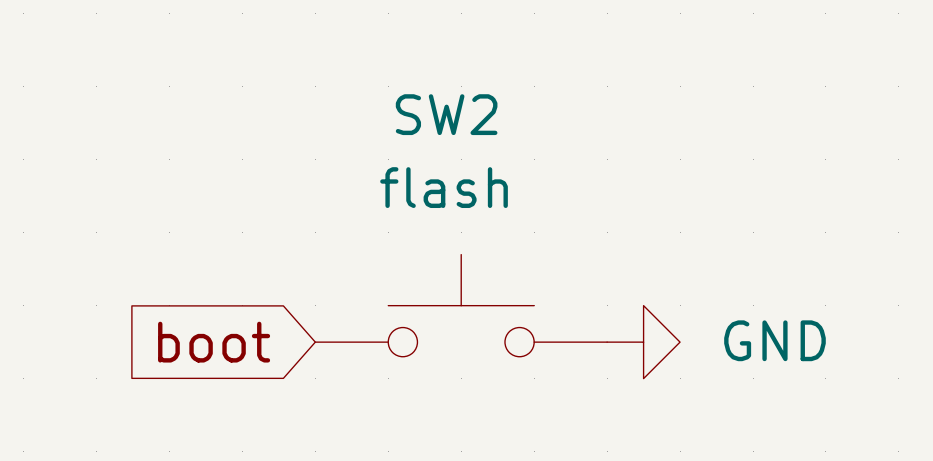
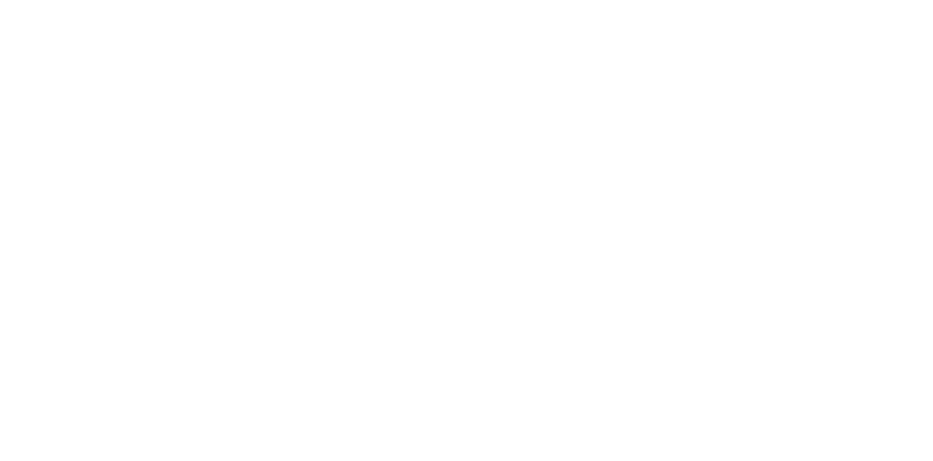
SW2: flash (461, 305) -> none
global label: boot (214, 342) -> none
power symbol: GND (643, 342) -> none

